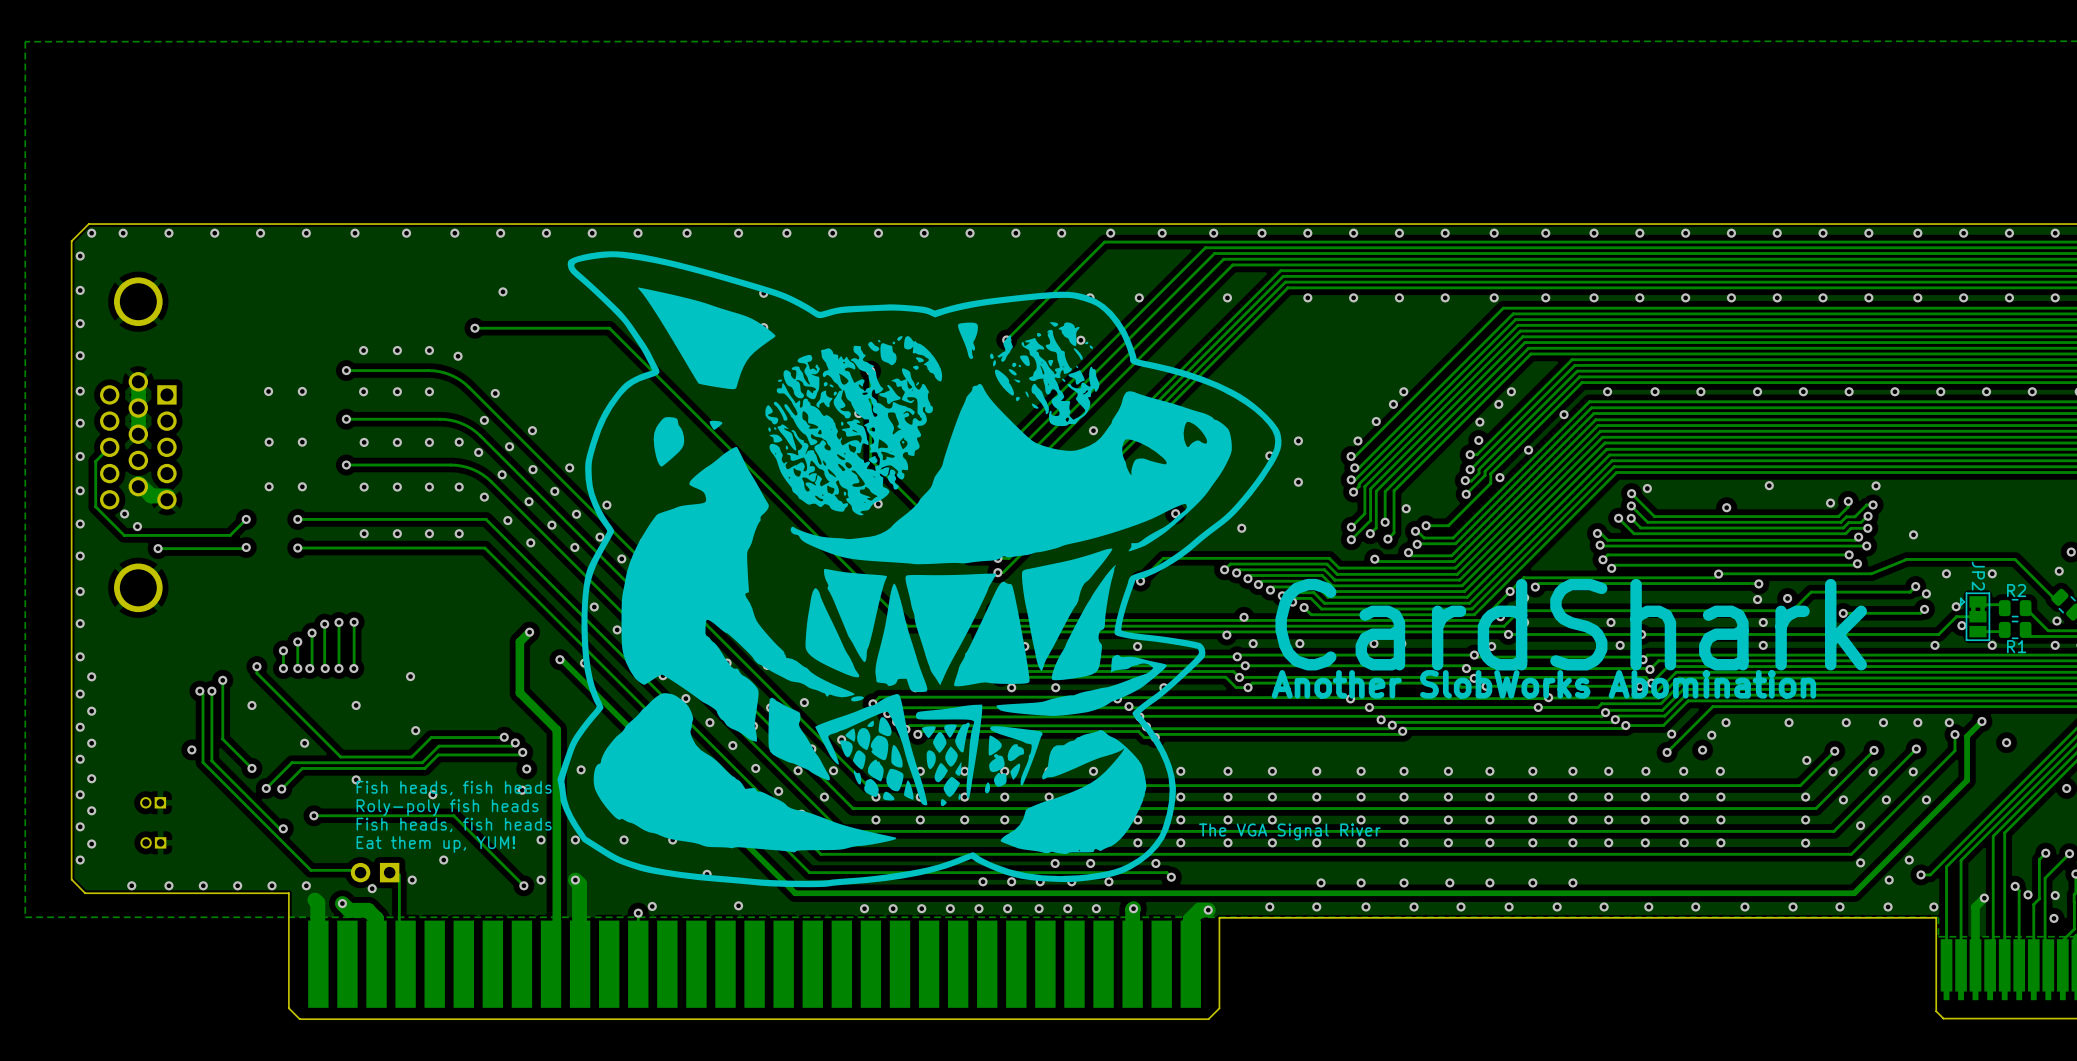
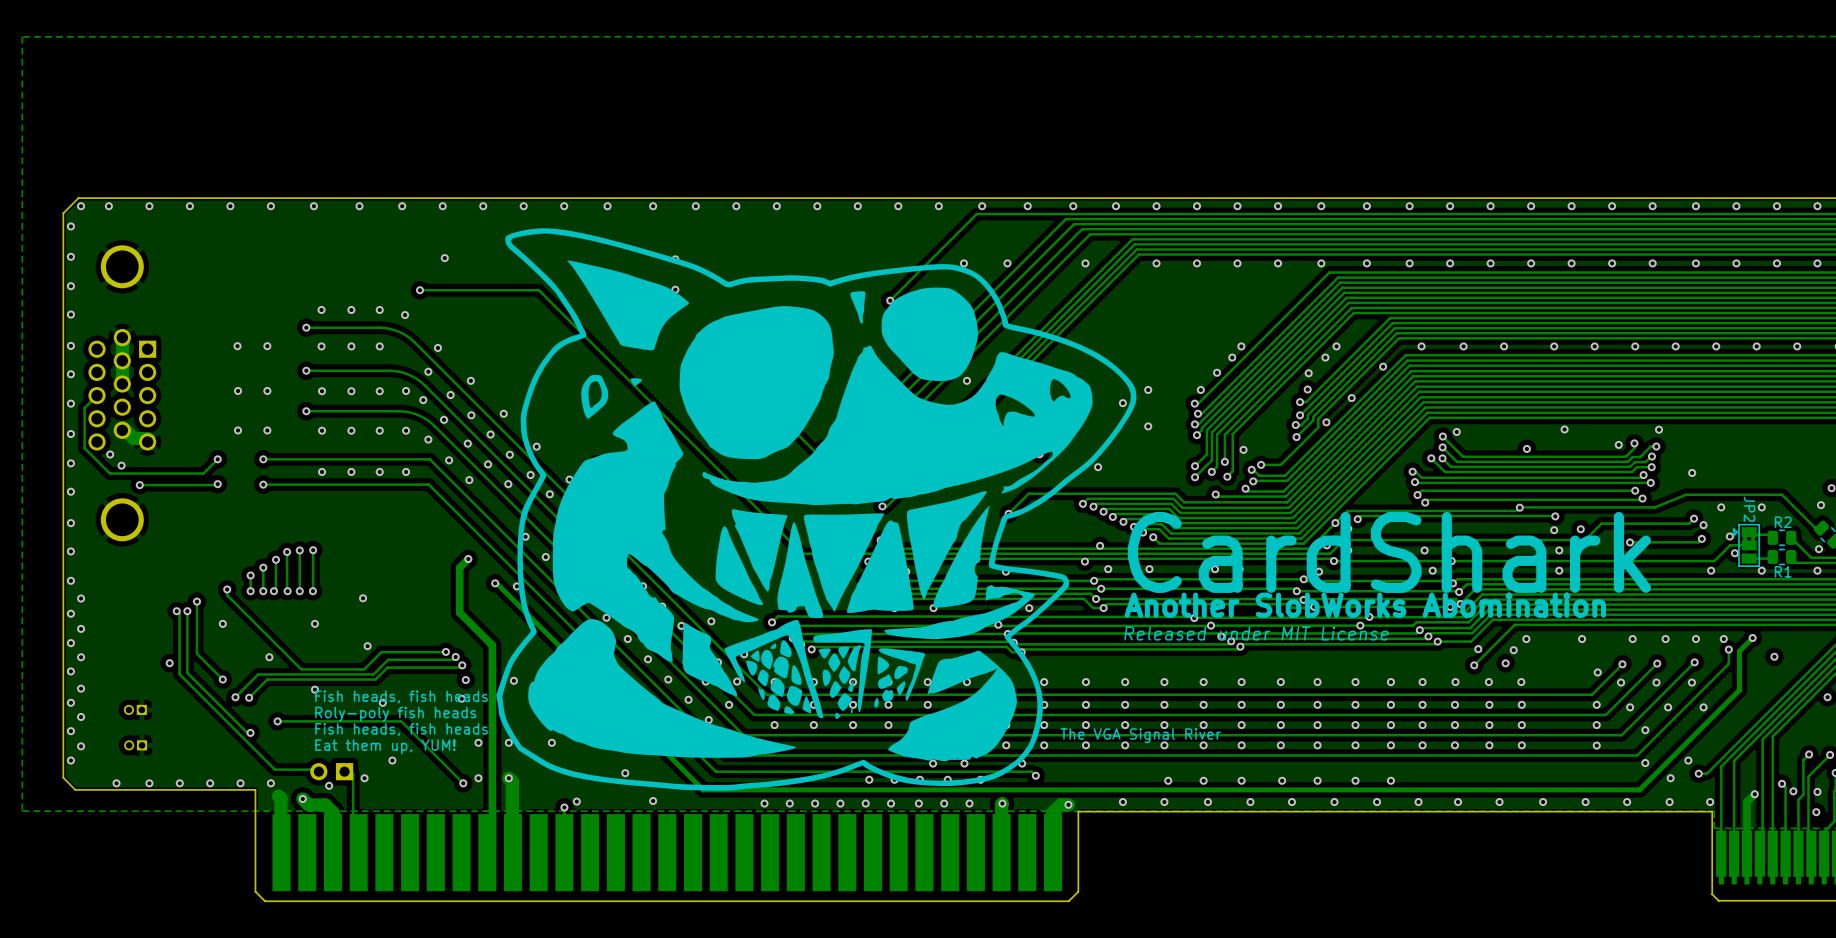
drawing shape: [557, 251, 1282, 888] -> [496, 228, 1137, 791]
text: none -> Released under MIT License (1256, 633)

